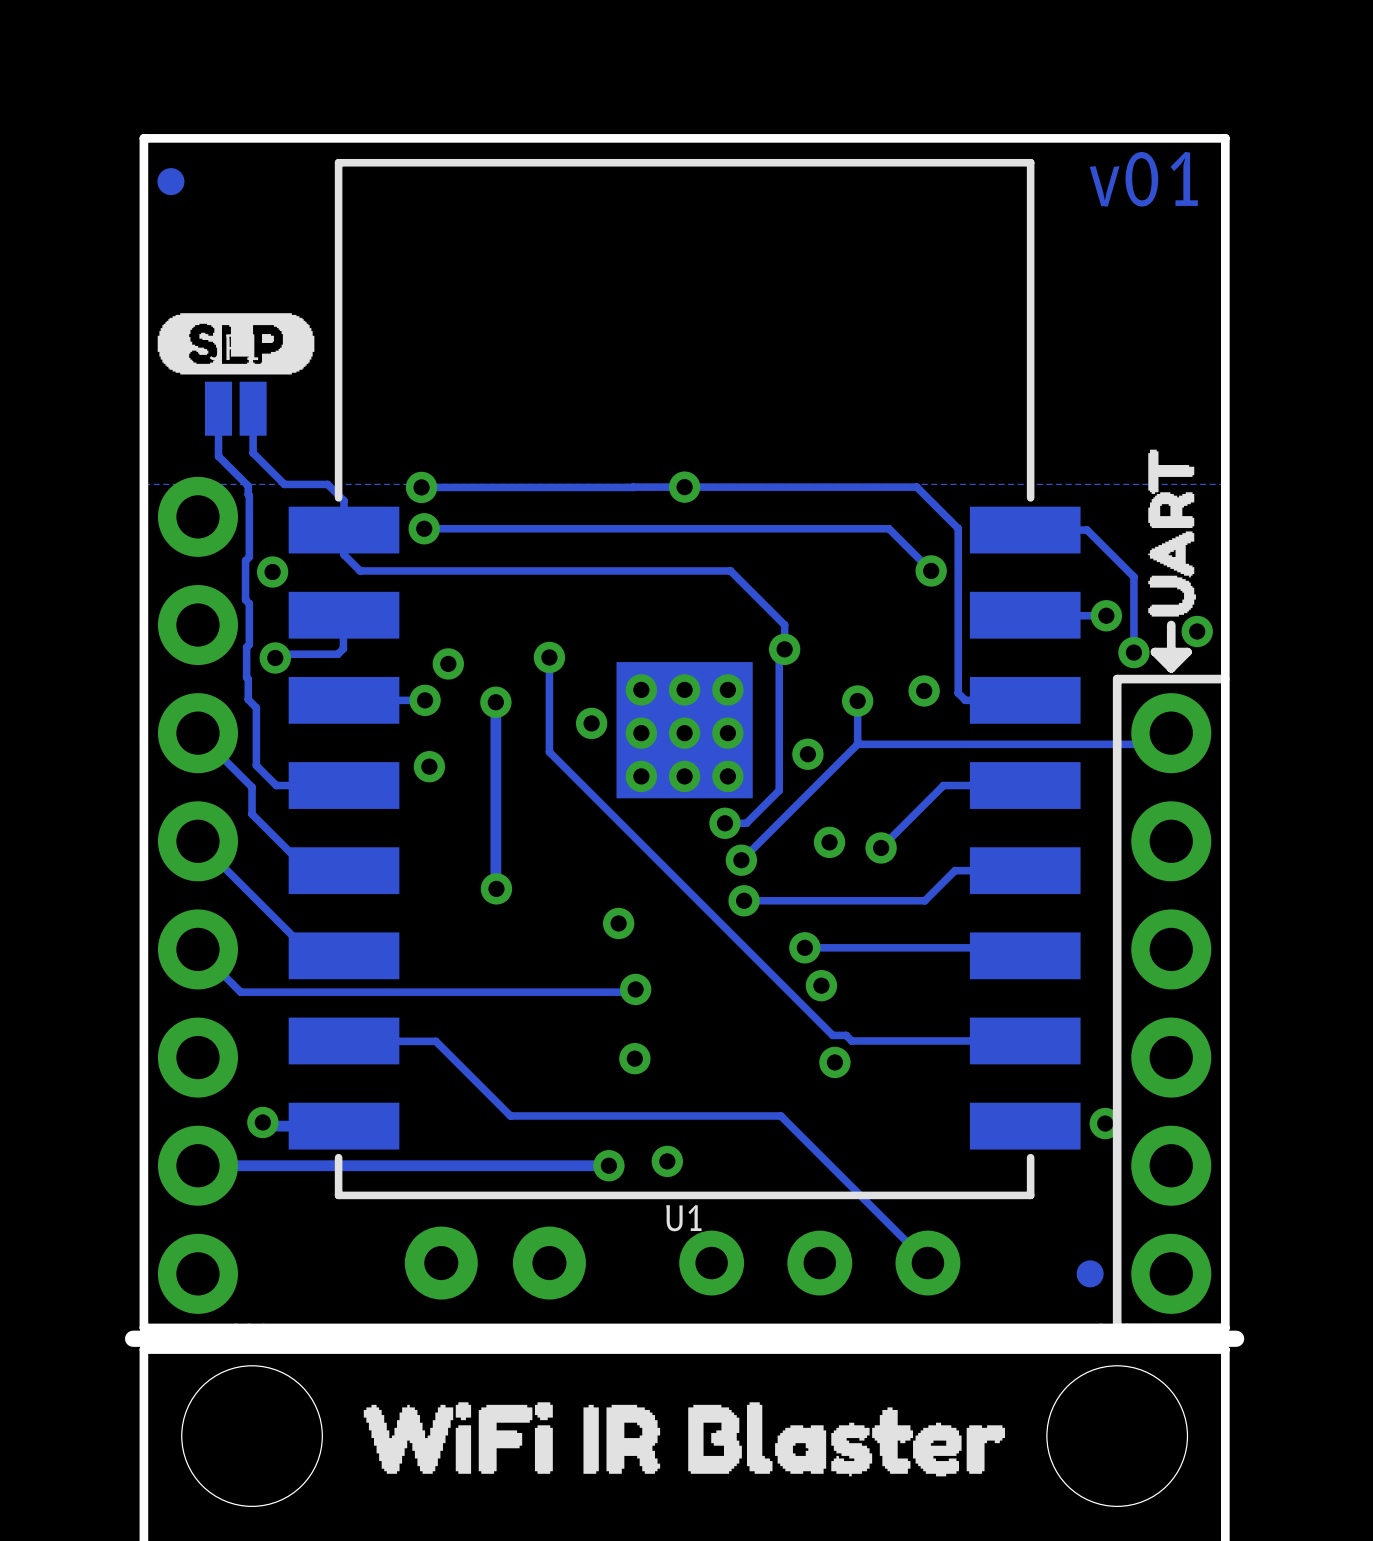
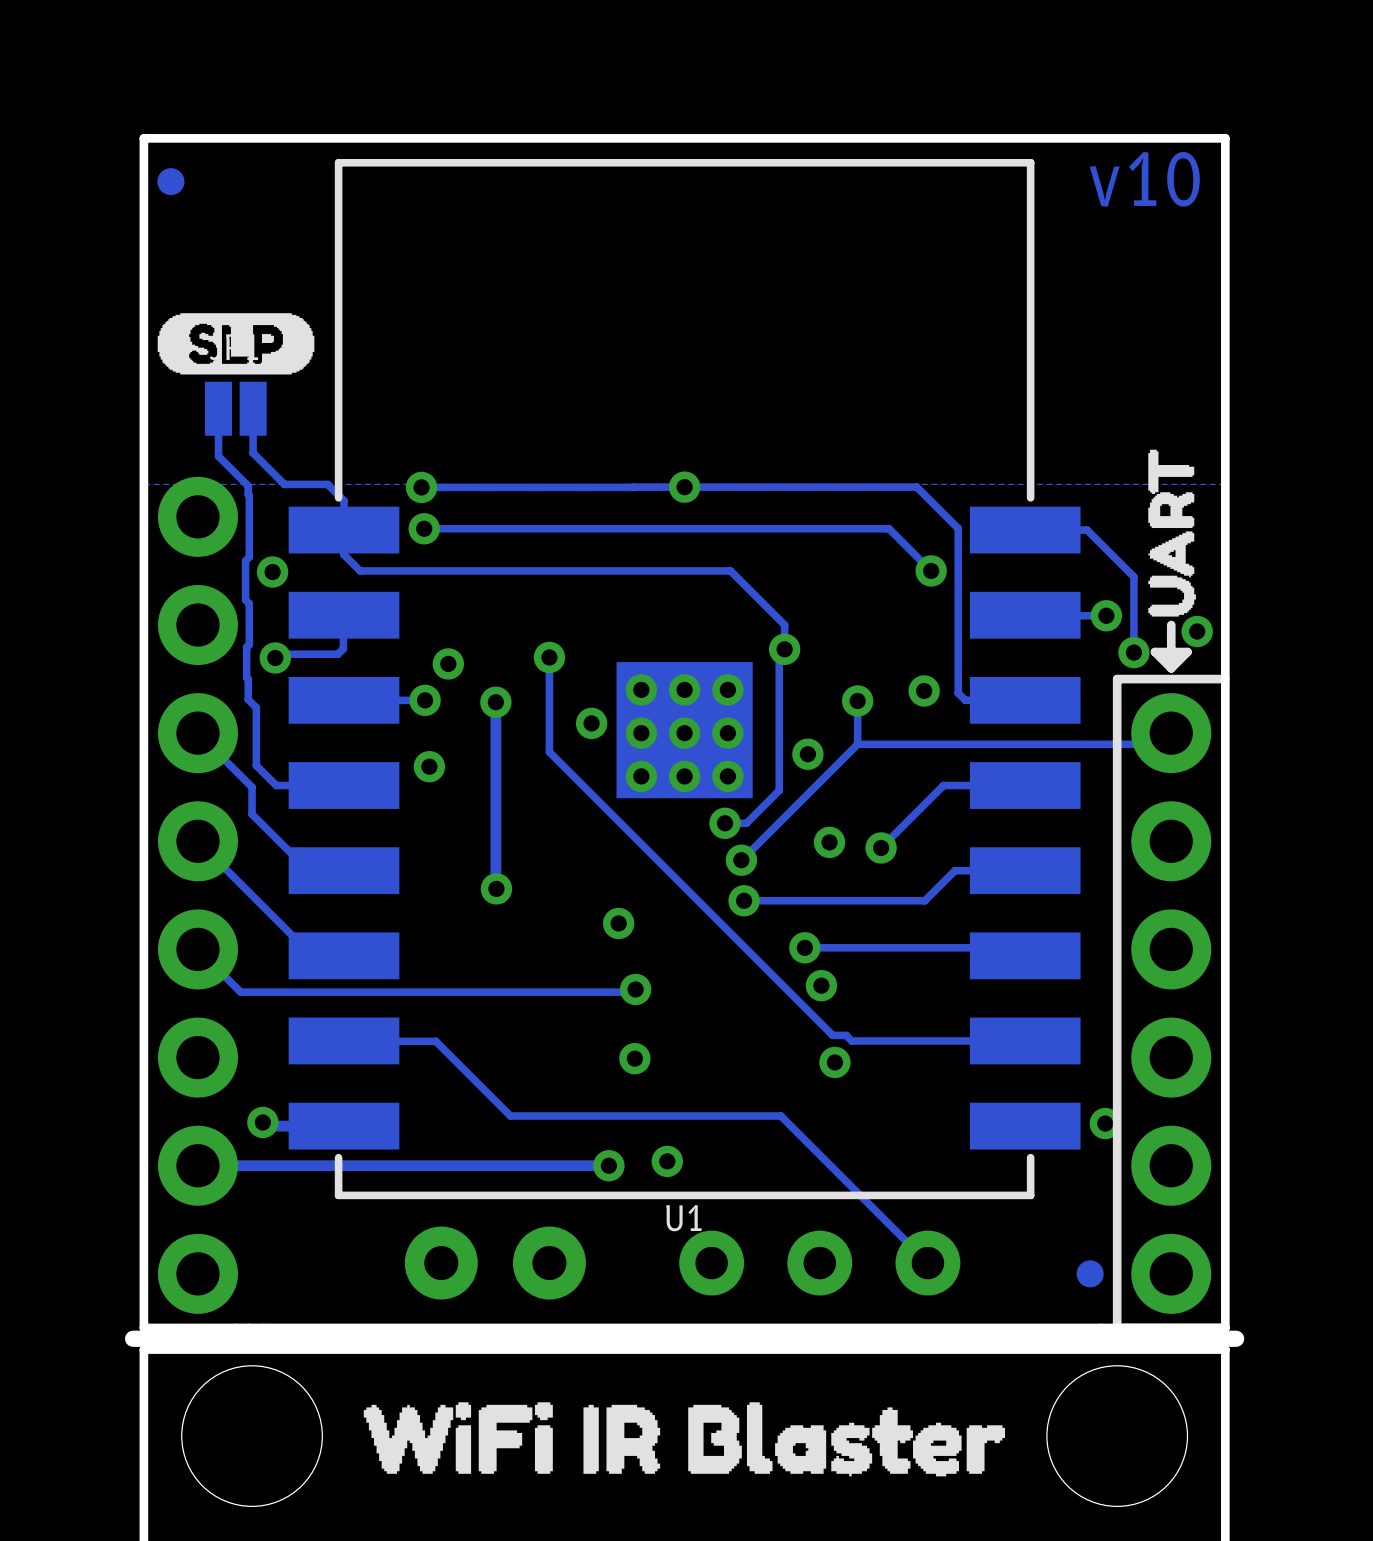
text: v01 (1143, 179) -> v10 (1144, 179)

